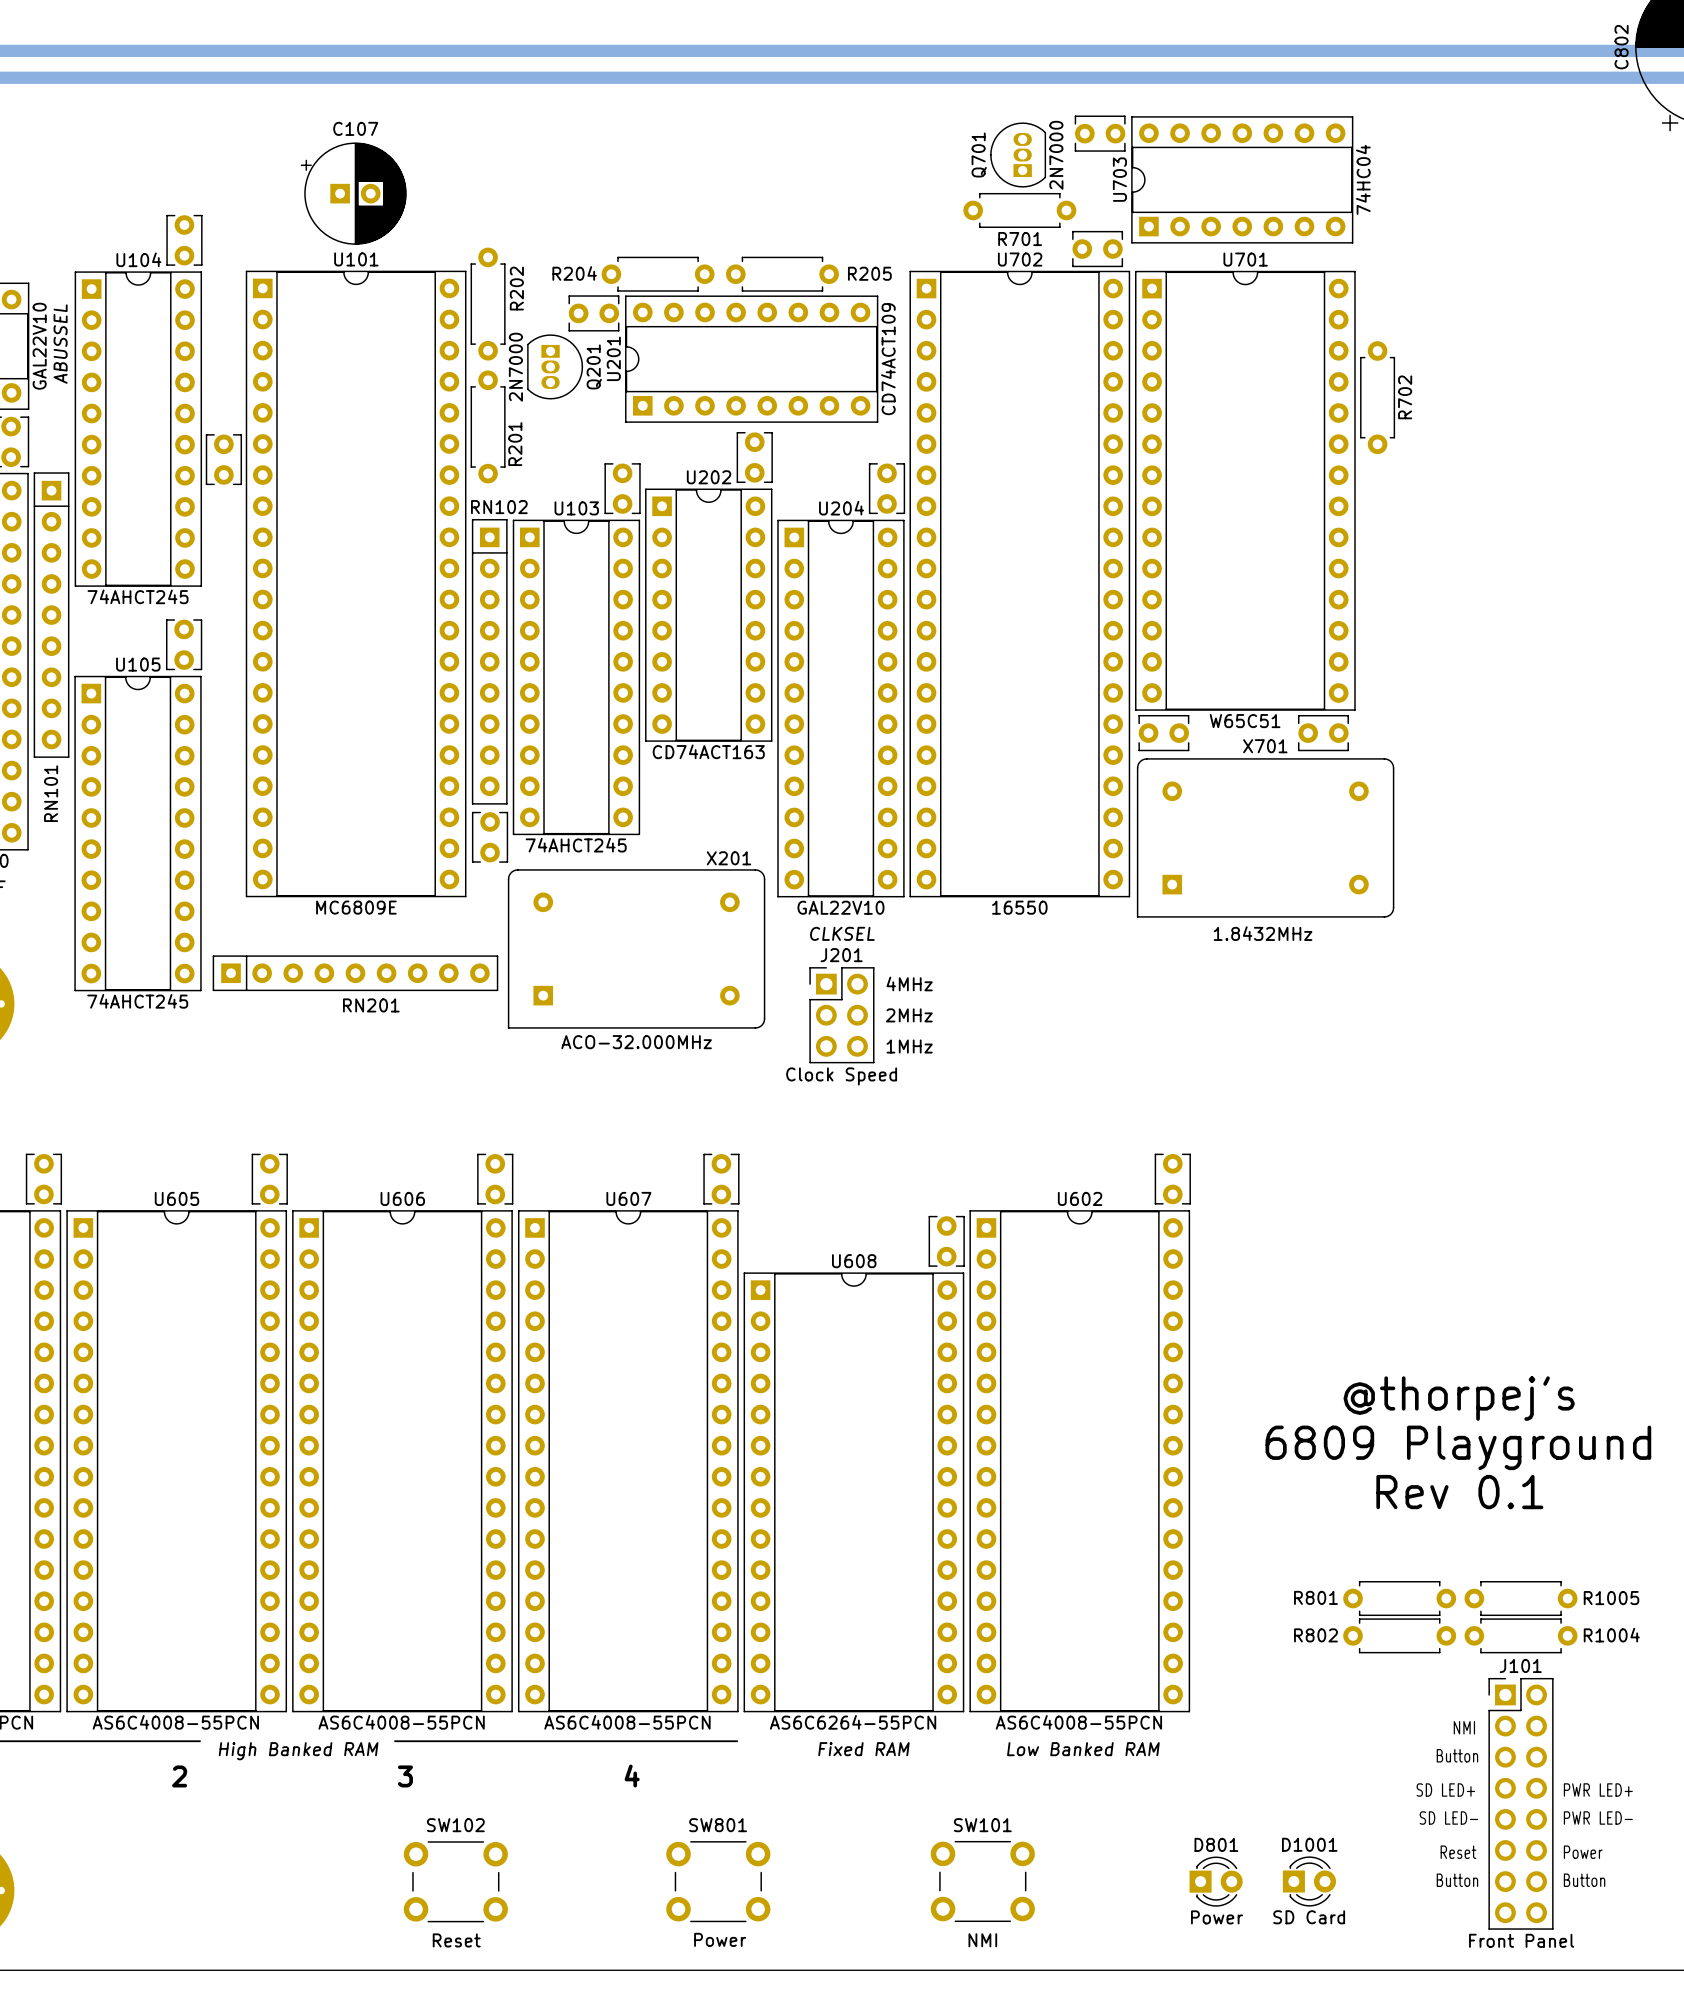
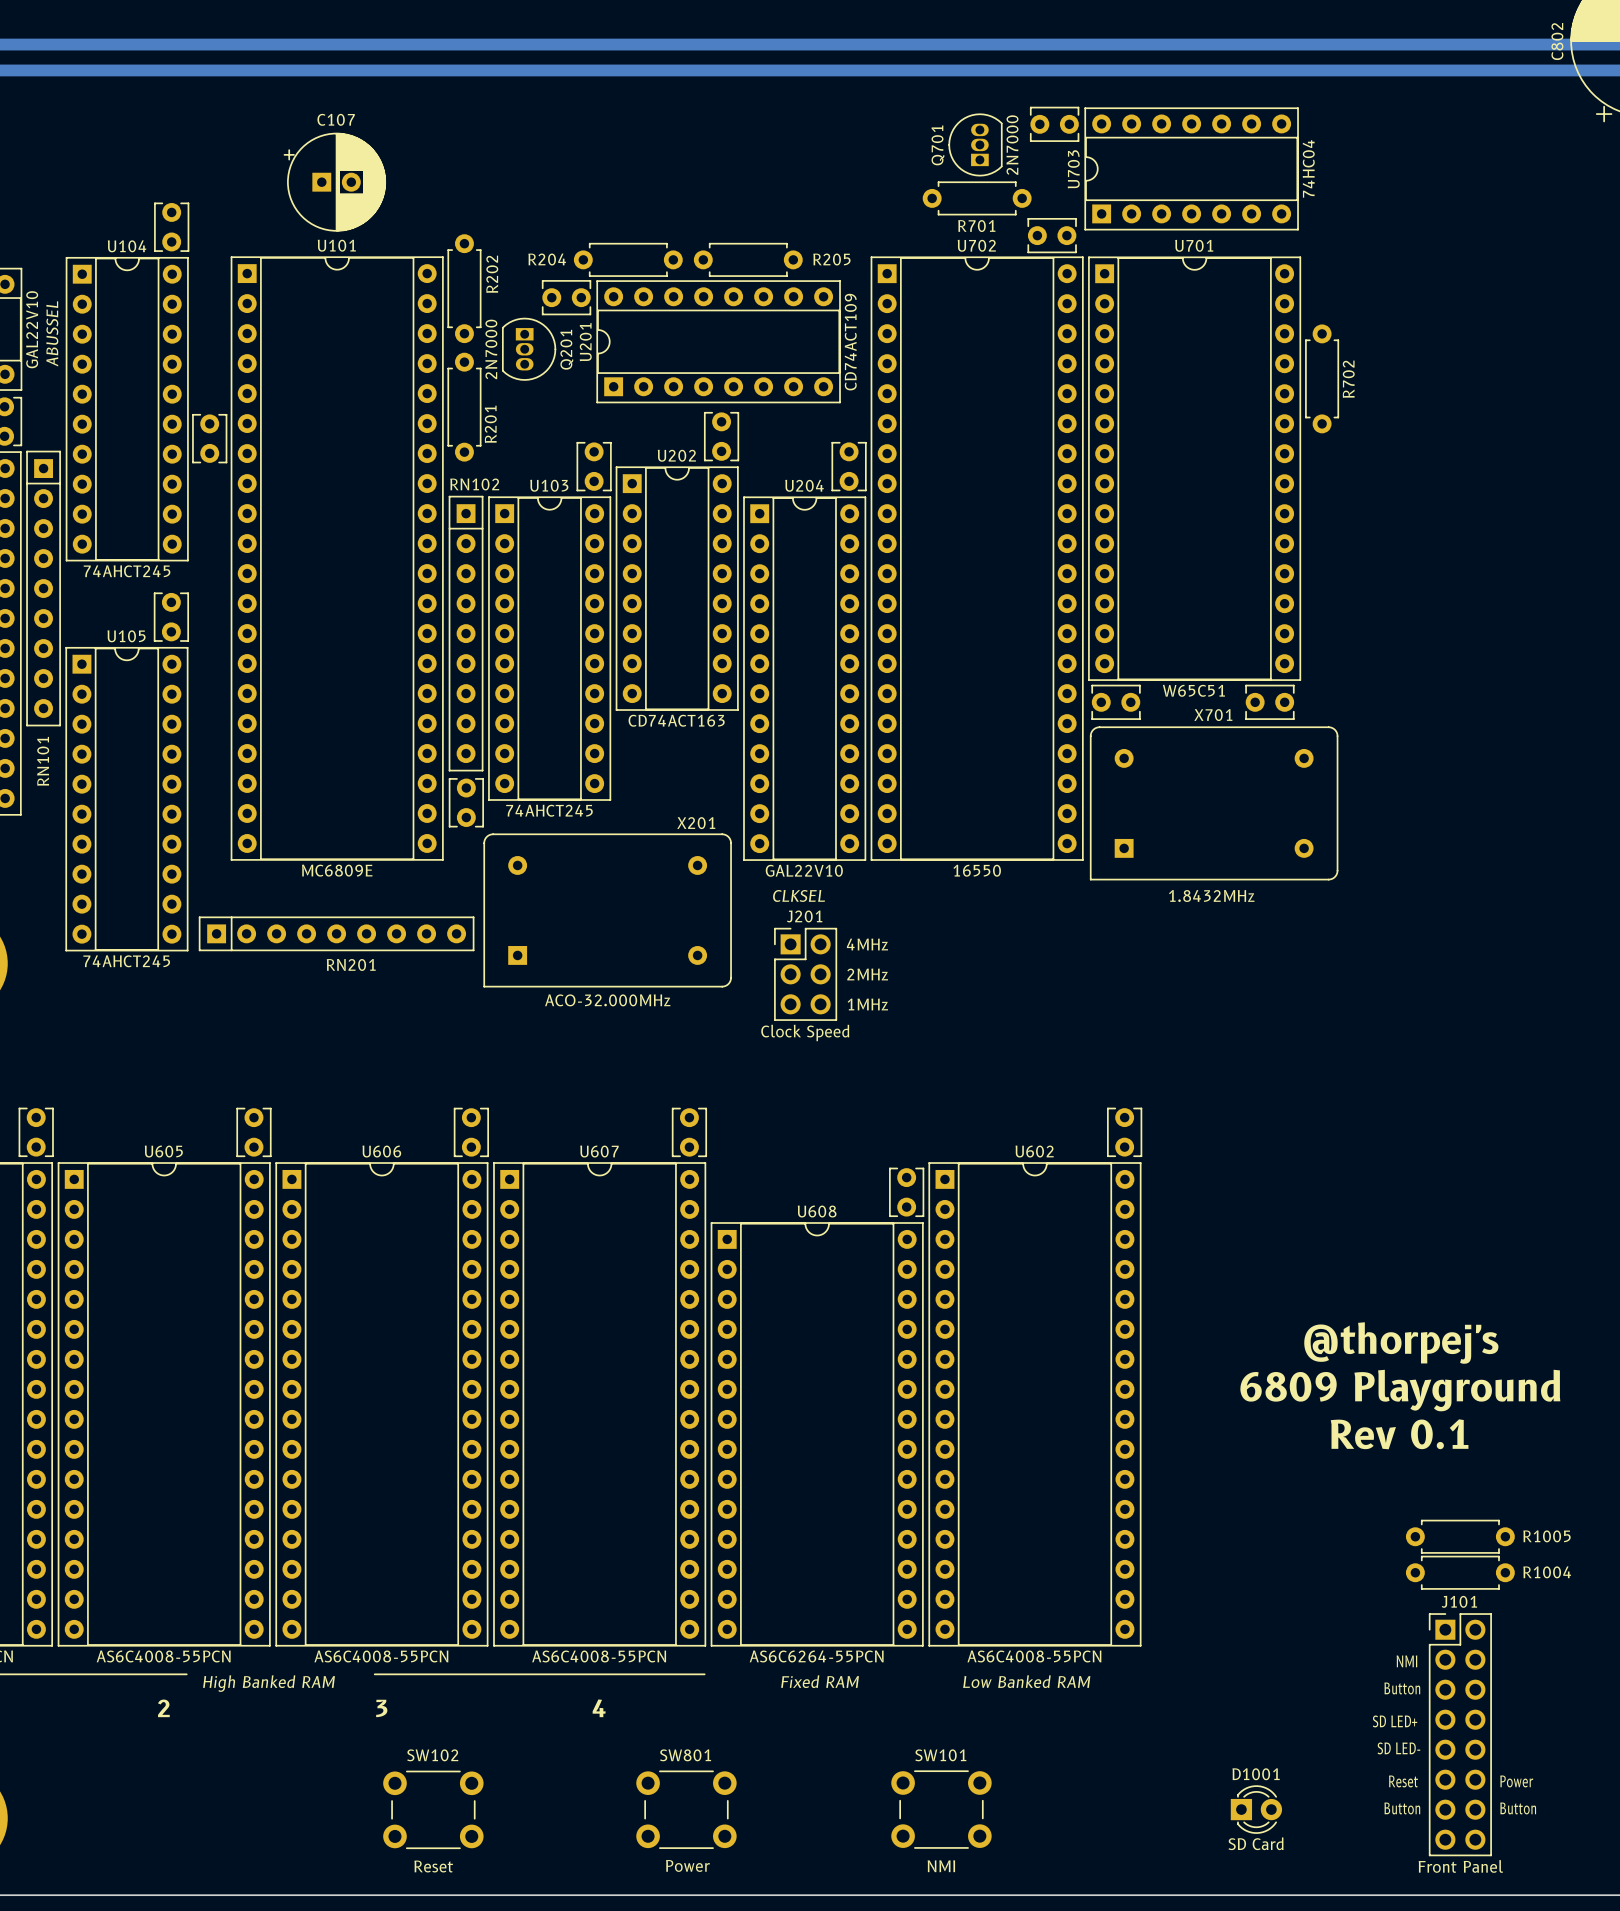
R801: (1399, 1598) -> none
R802: (1399, 1635) -> none
text: PWR LED+ (1598, 1790) -> none
text: PWR LED- (1598, 1818) -> none
D801: Power (1216, 1881) -> none

